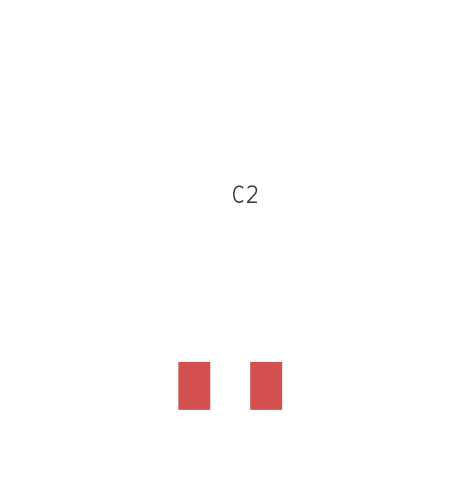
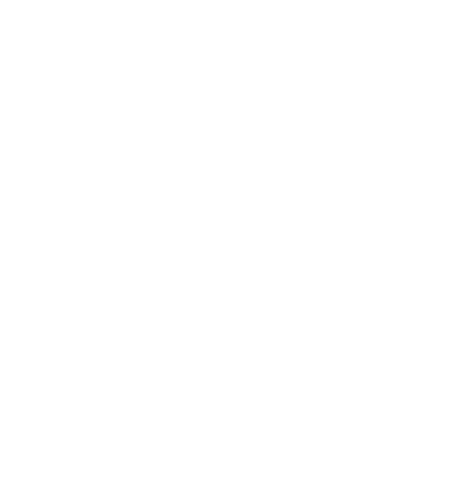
C2: (230, 385) -> none

